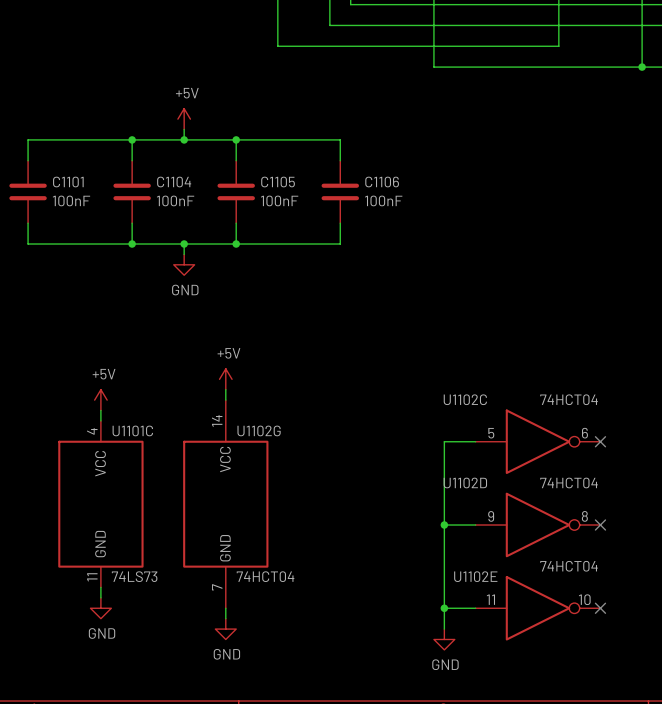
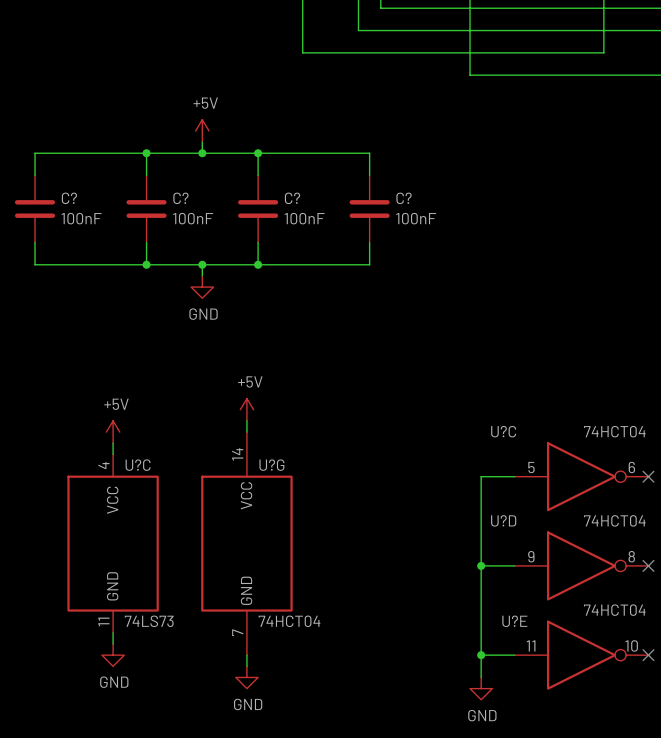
C1101 name: C1101 (68, 182) -> C? (69, 198)
C1104 name: C1104 (174, 182) -> C? (180, 198)
C1105 name: C1105 (278, 182) -> C? (292, 198)
C1106 name: C1106 (382, 182) -> C? (404, 198)
U1102C name: U1102C (465, 399) -> U?C (503, 431)
U1101C name: U1101C (132, 430) -> U?C (138, 465)
U1102G name: U1102G (259, 430) -> U?G (271, 465)
U1102D name: U1102D (465, 482) -> U?D (503, 520)
U1102E name: U1102E (475, 576) -> U?E (514, 621)

